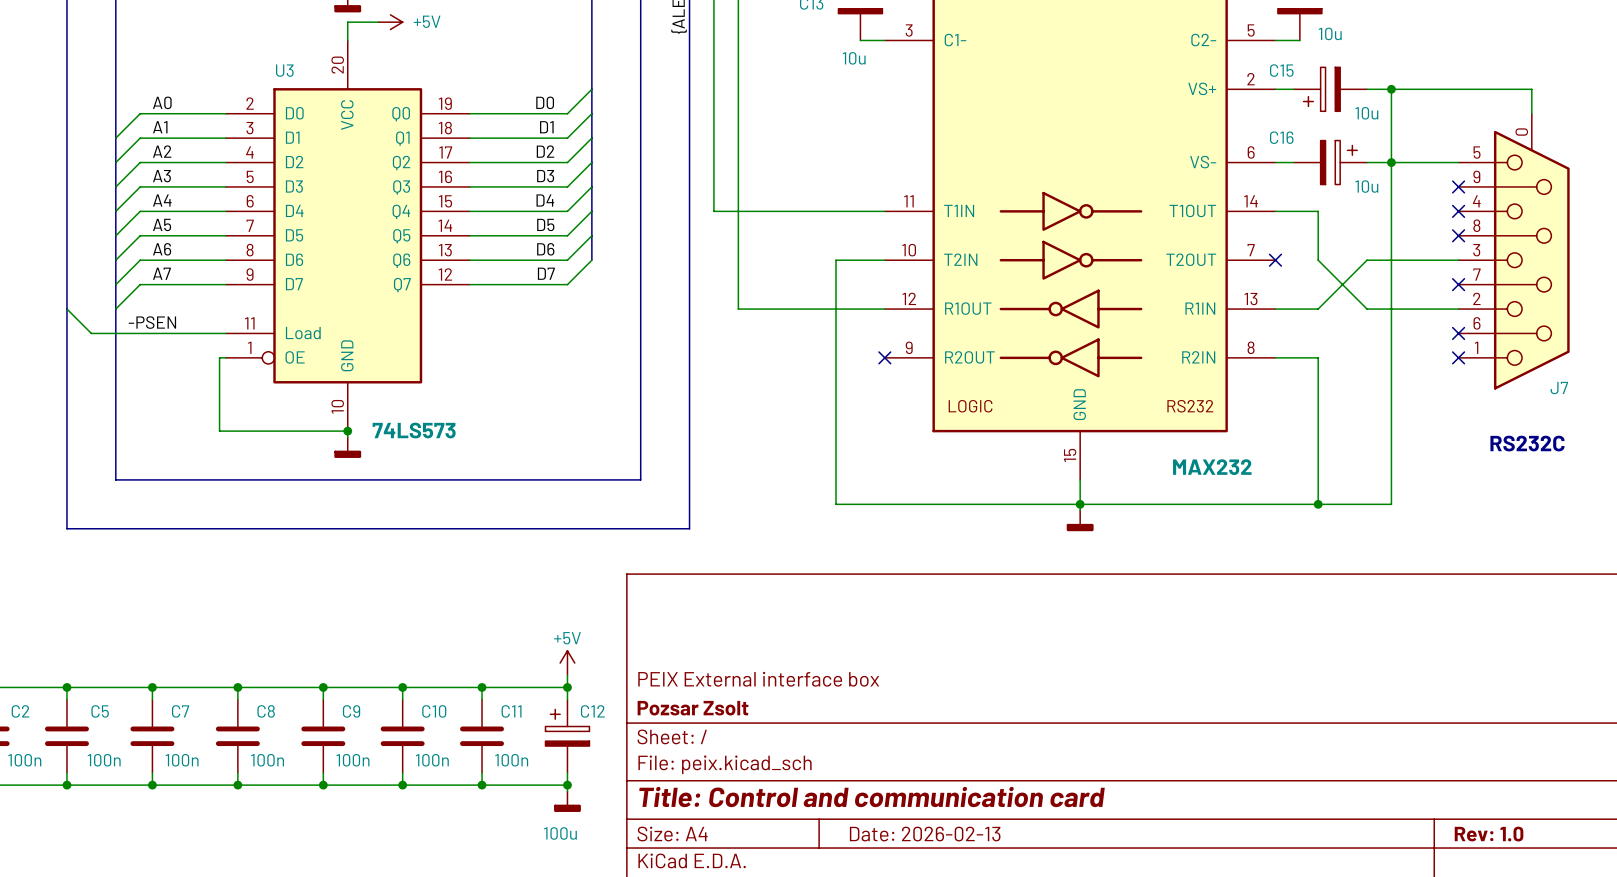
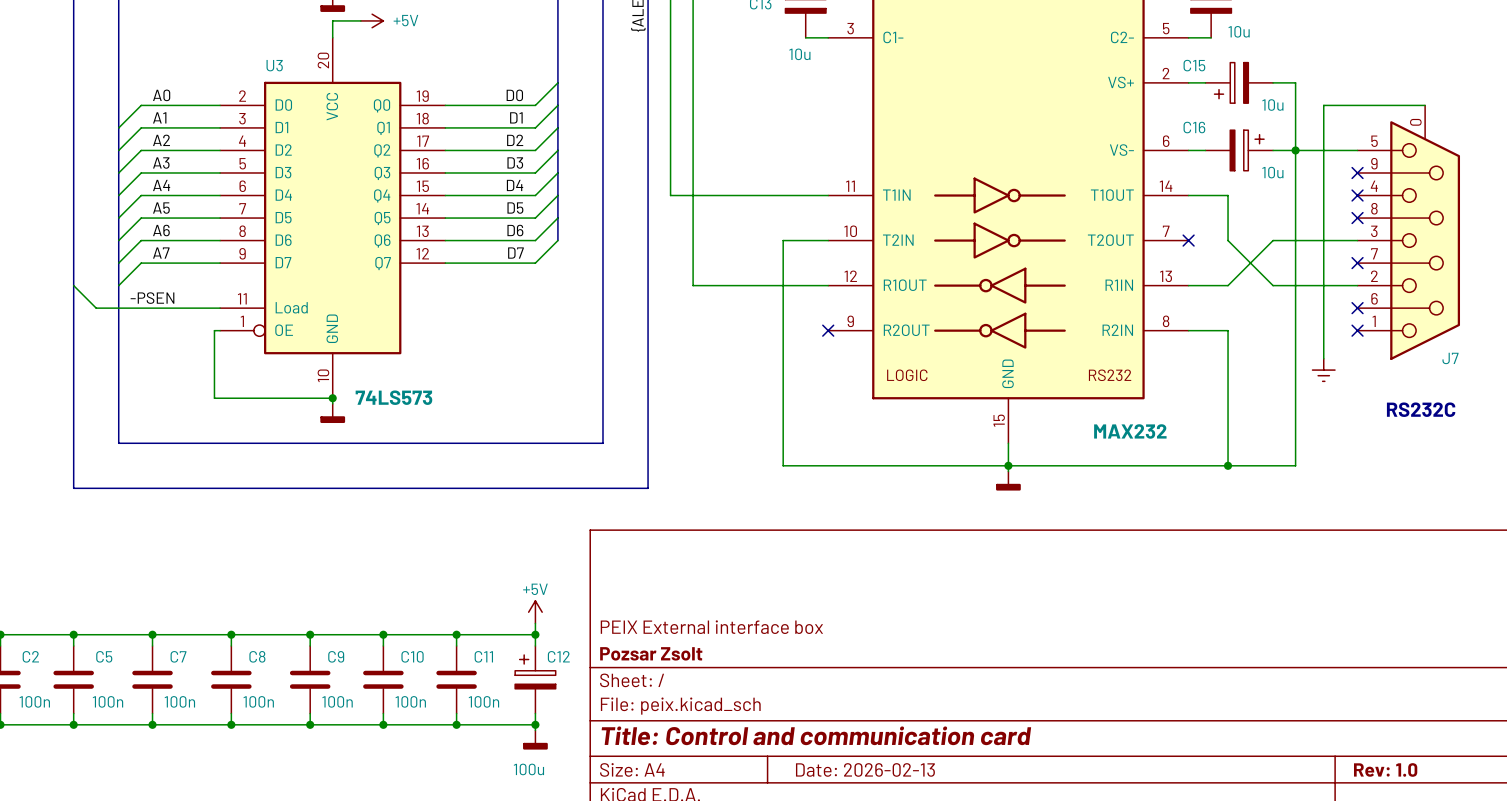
wire: (1391, 89) (1531, 89) (1531, 113) -> (1323, 358) (1323, 105) (1425, 105)
junction: (1391, 89) -> none
power symbol: none -> (1323, 370)

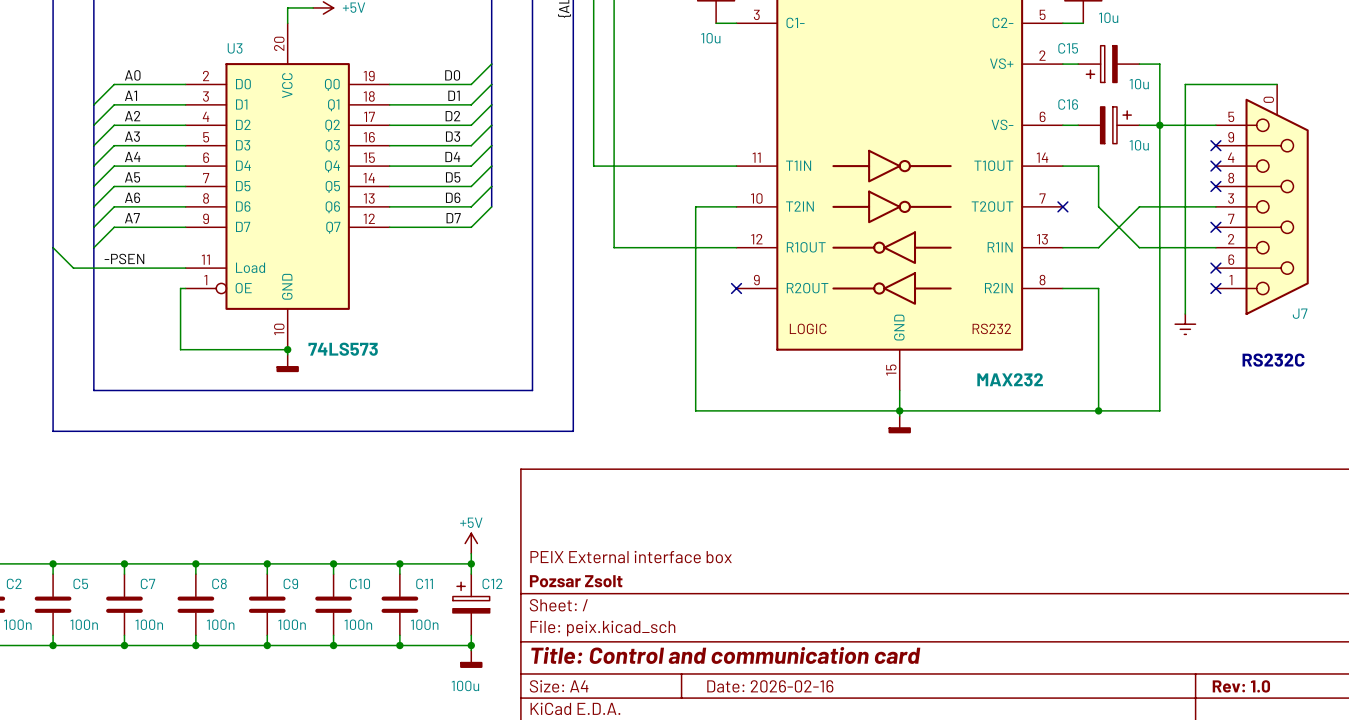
title block: Date: 2026-02-13 (865, 769) -> Date: 2026-02-16 (770, 686)

